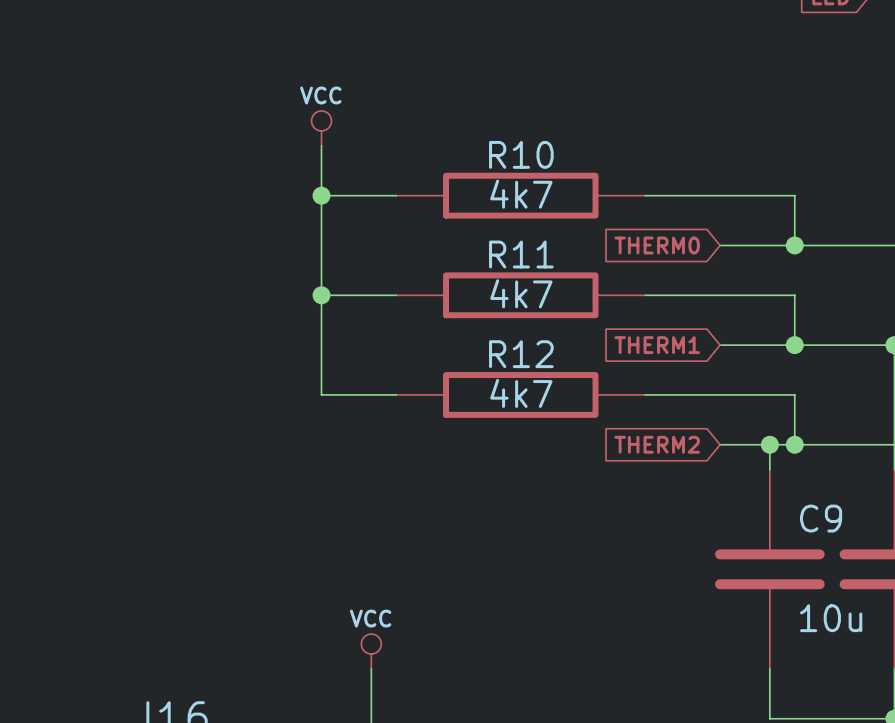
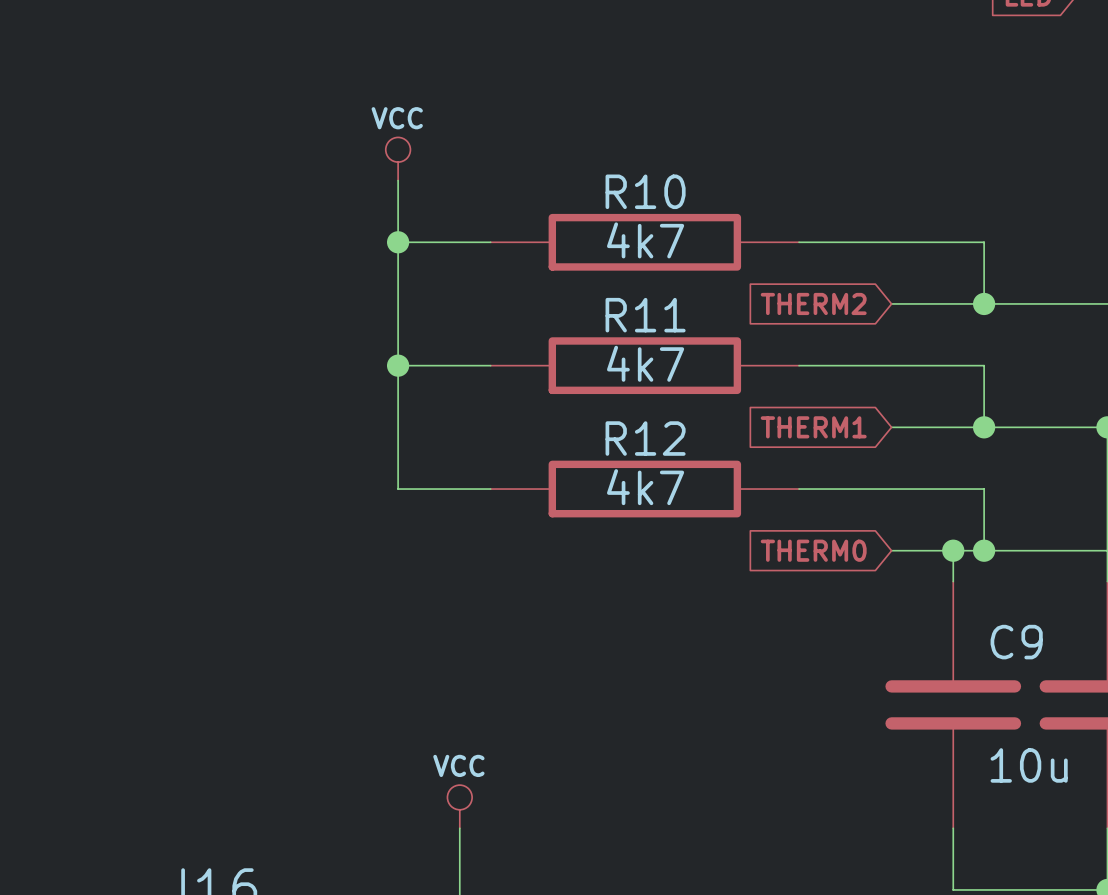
global label: THERM0 (657, 245) -> THERM2 (813, 303)
global label: THERM2 (657, 444) -> THERM0 (813, 550)

